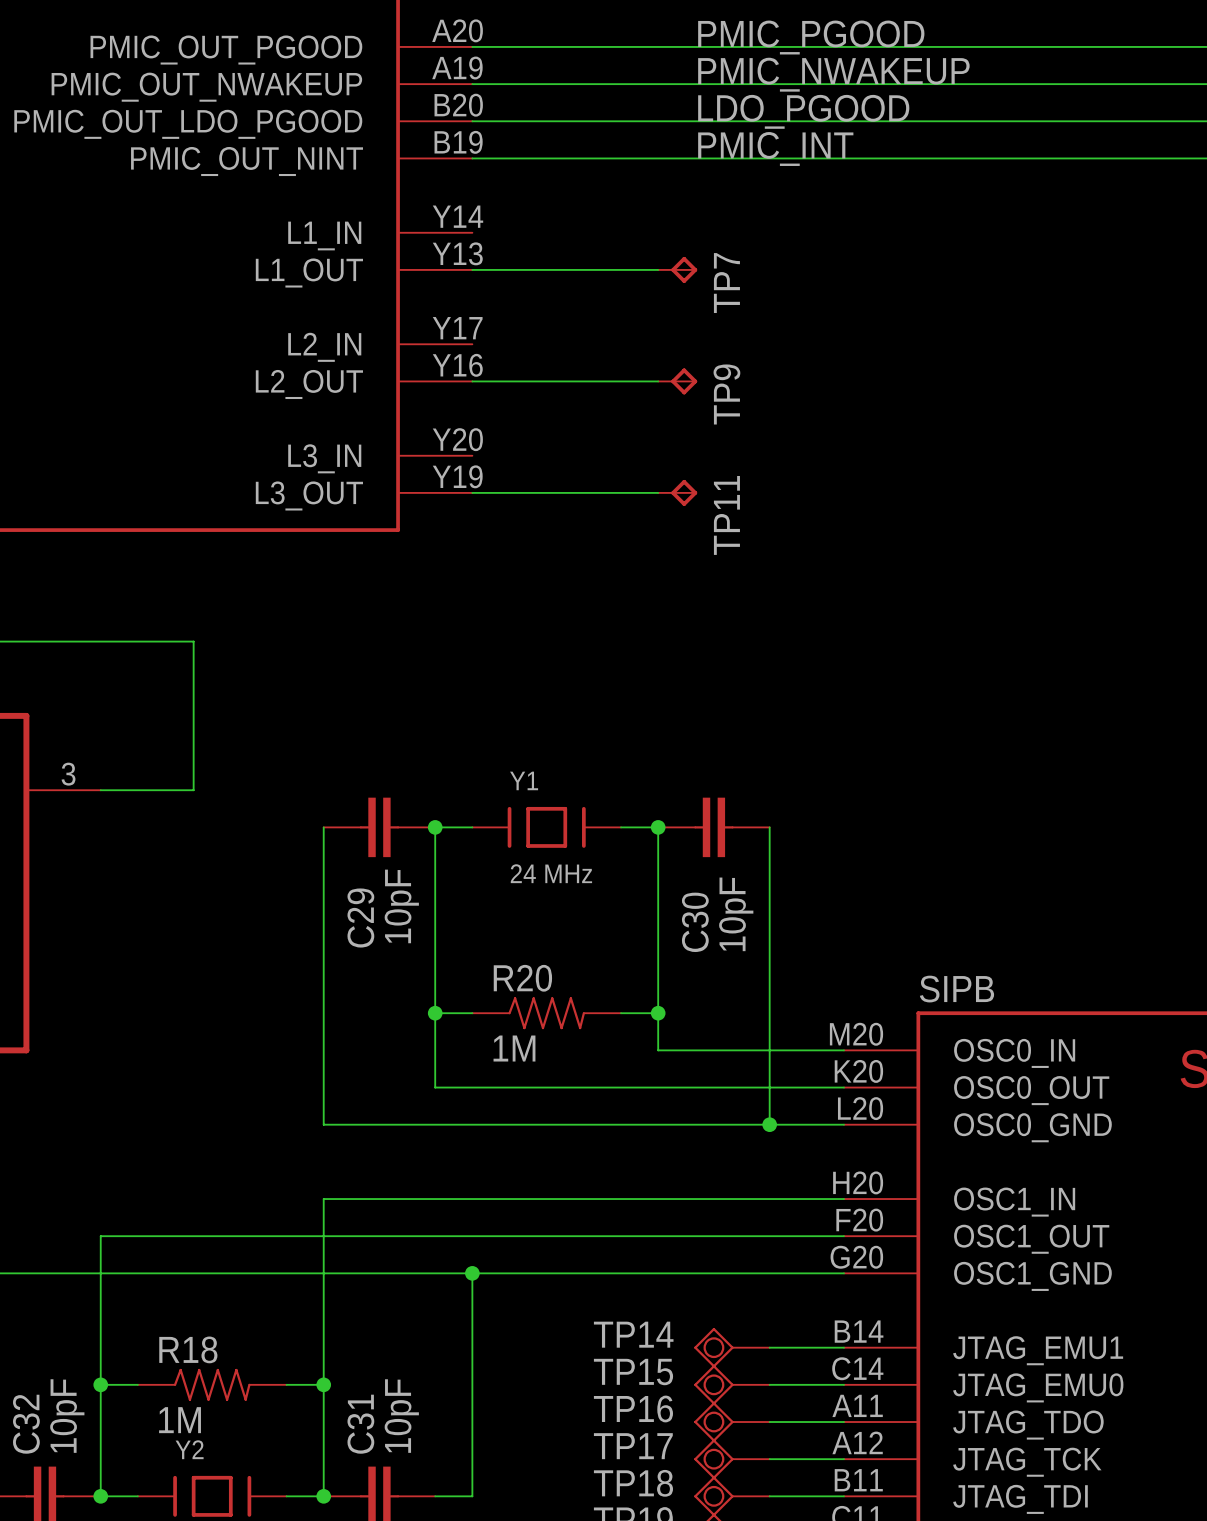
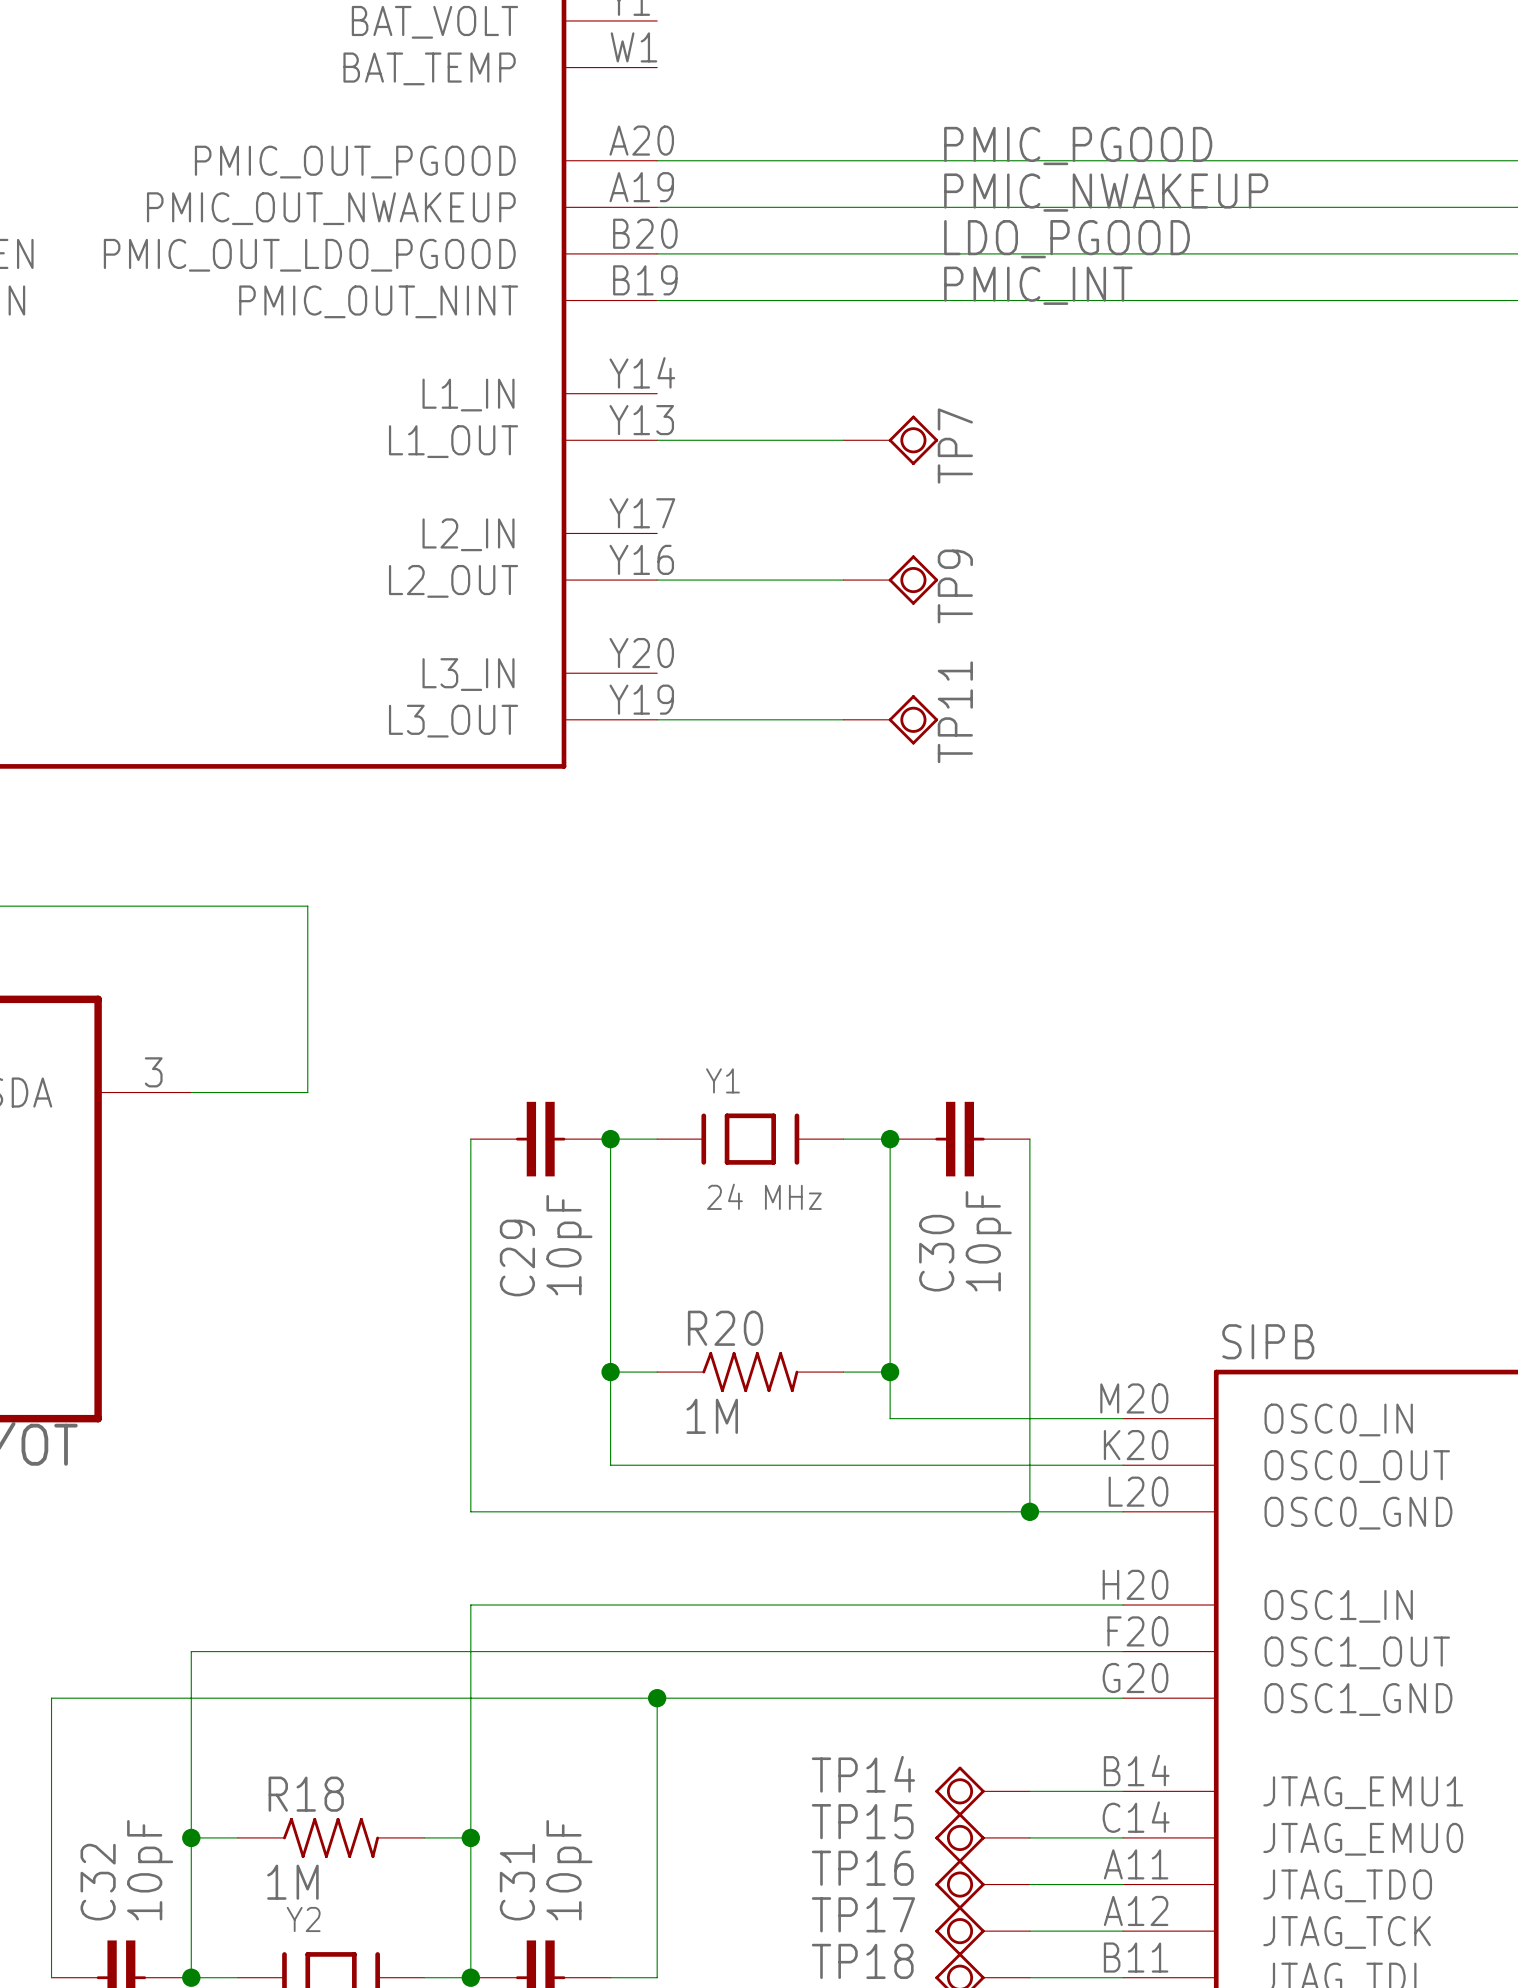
TP7 symbol: [658, 256, 698, 283] -> [843, 415, 939, 465]
TP9 symbol: [658, 368, 698, 395] -> [843, 555, 939, 605]
TP11 symbol: [658, 479, 698, 506] -> [843, 695, 939, 745]
TP11 name position: TP11 (726, 515) -> TP11 (955, 712)

